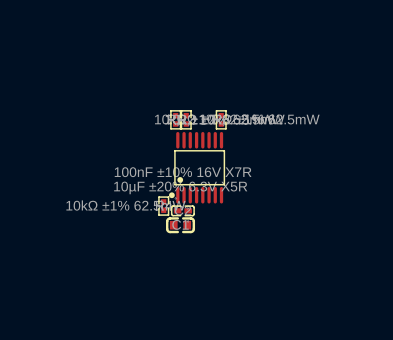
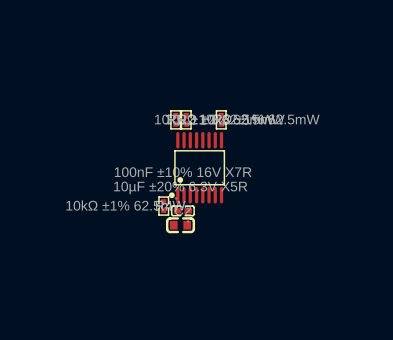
C1 name: C1 (180, 224) -> none

